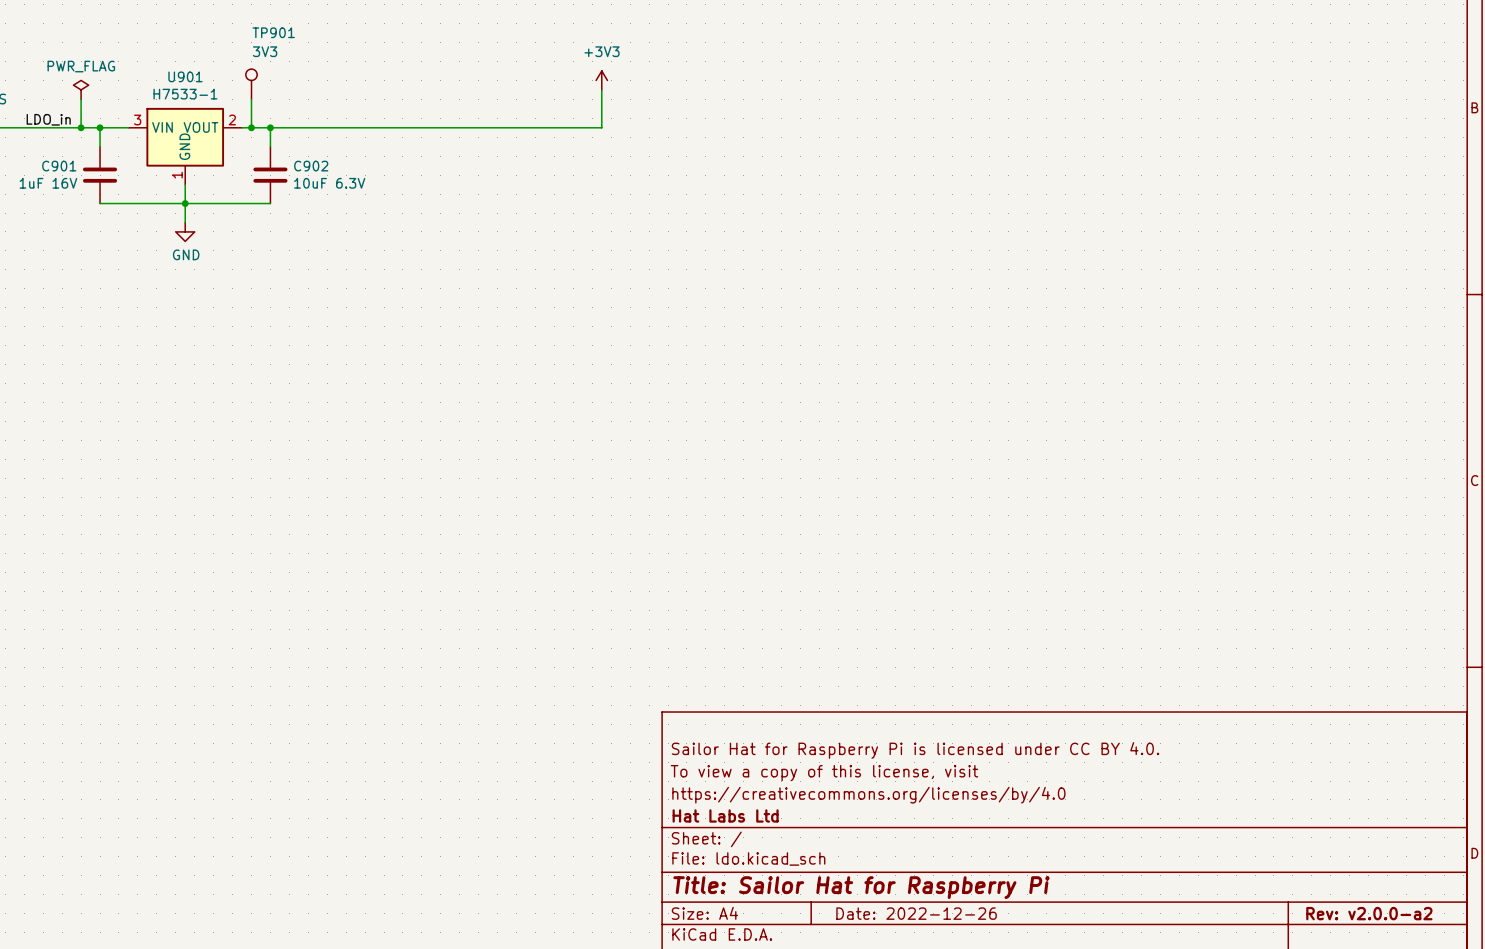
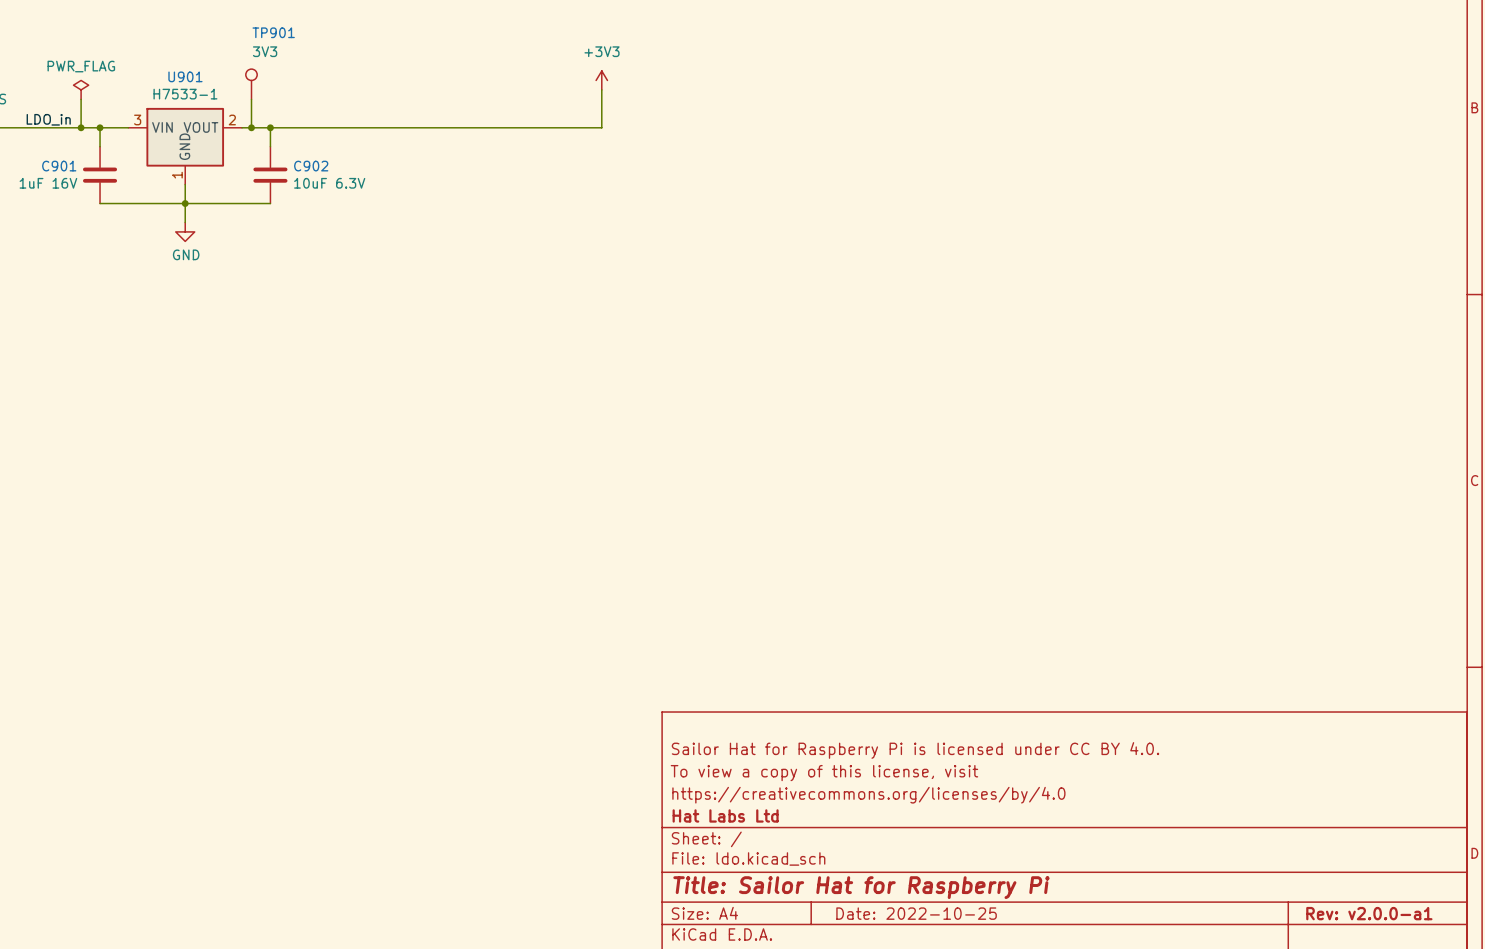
title block: Date: 2022-12-26 (916, 913) -> Date: 2022-10-25 (916, 913)
title block: Rev: v2.0.0-a2 (1369, 913) -> Rev: v2.0.0-a1 (1369, 913)

